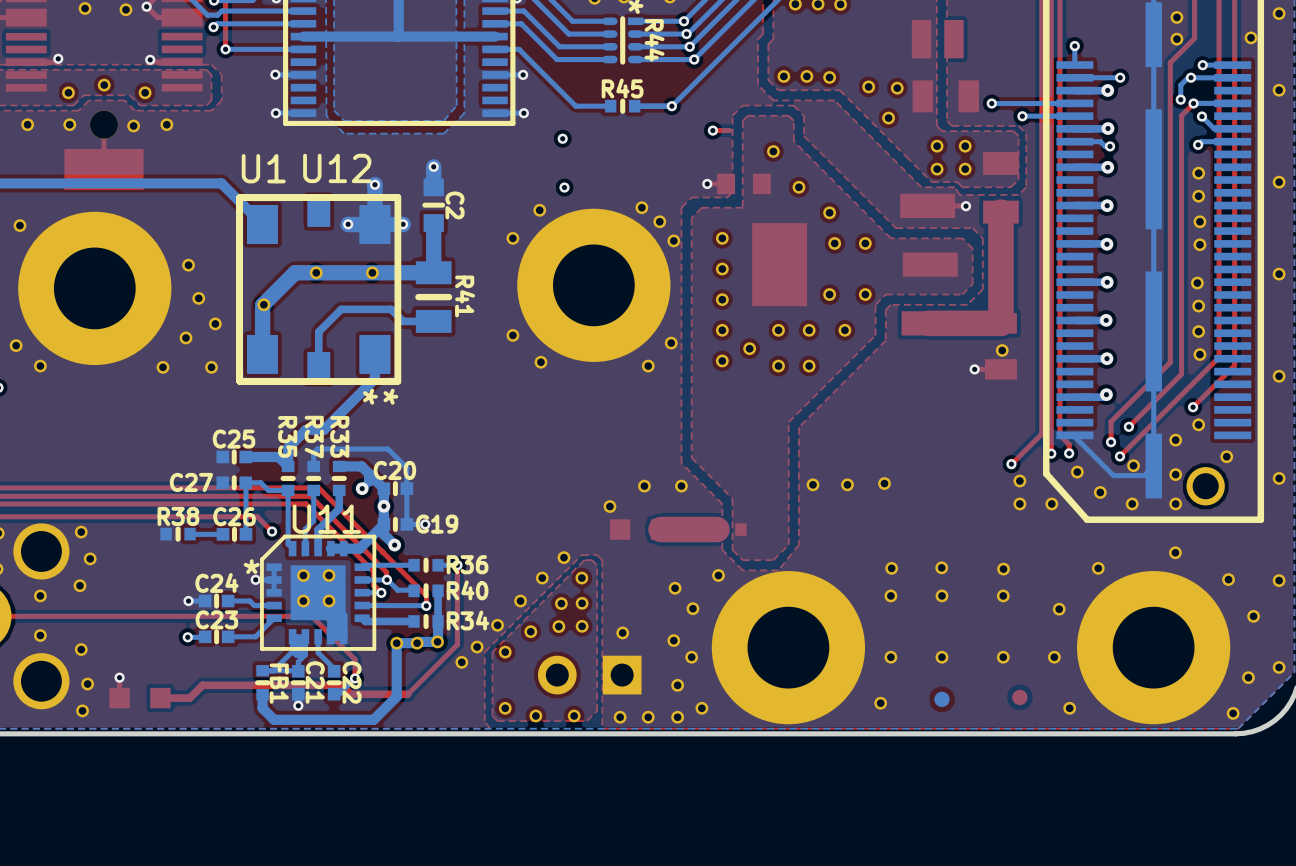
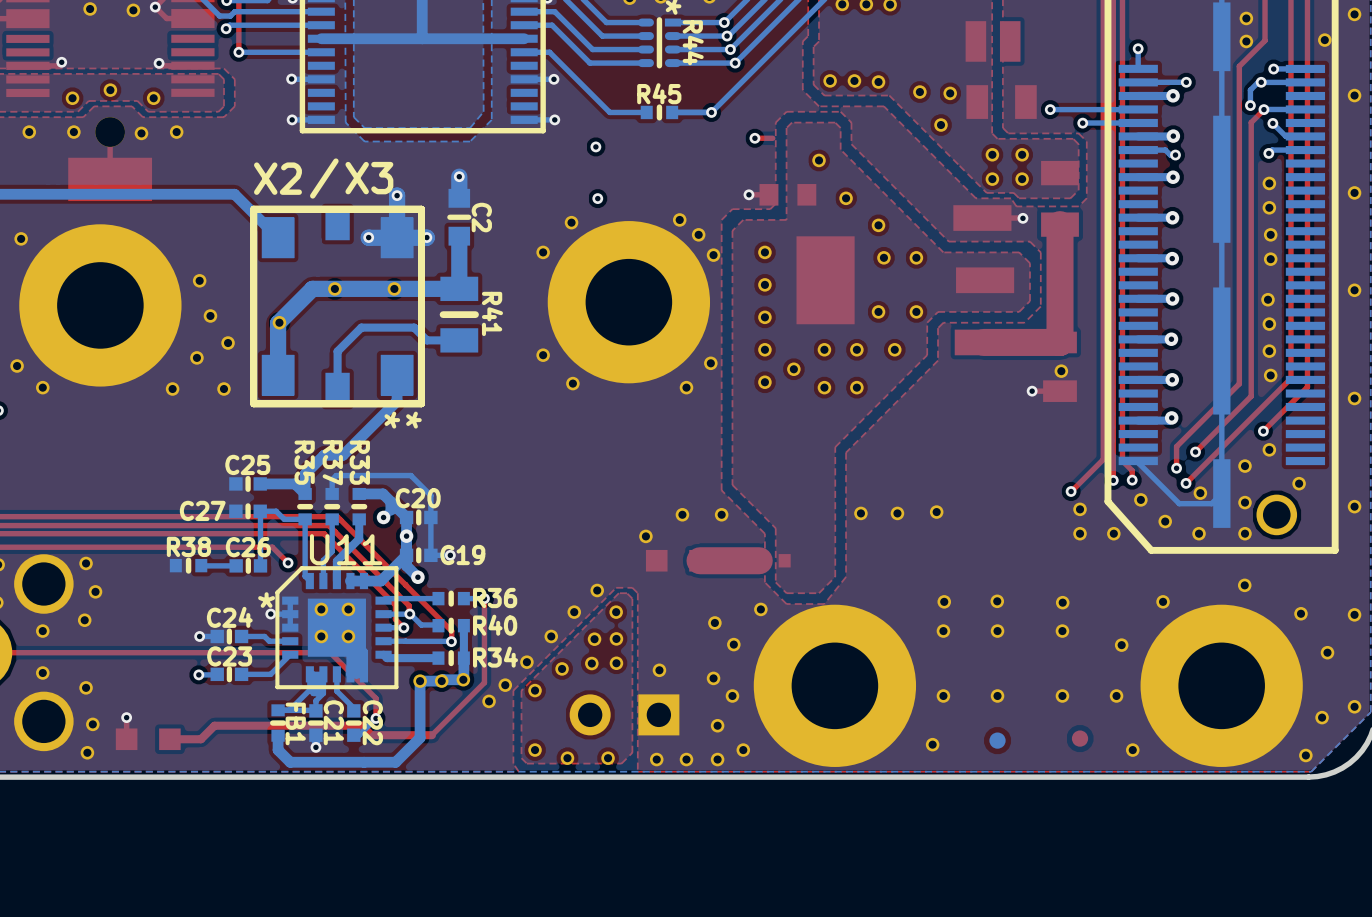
U1 name: U1 (263, 168) -> X2 (277, 178)
text: none -> / (324, 178)
U12 name: U12 (337, 168) -> X3 (369, 178)

